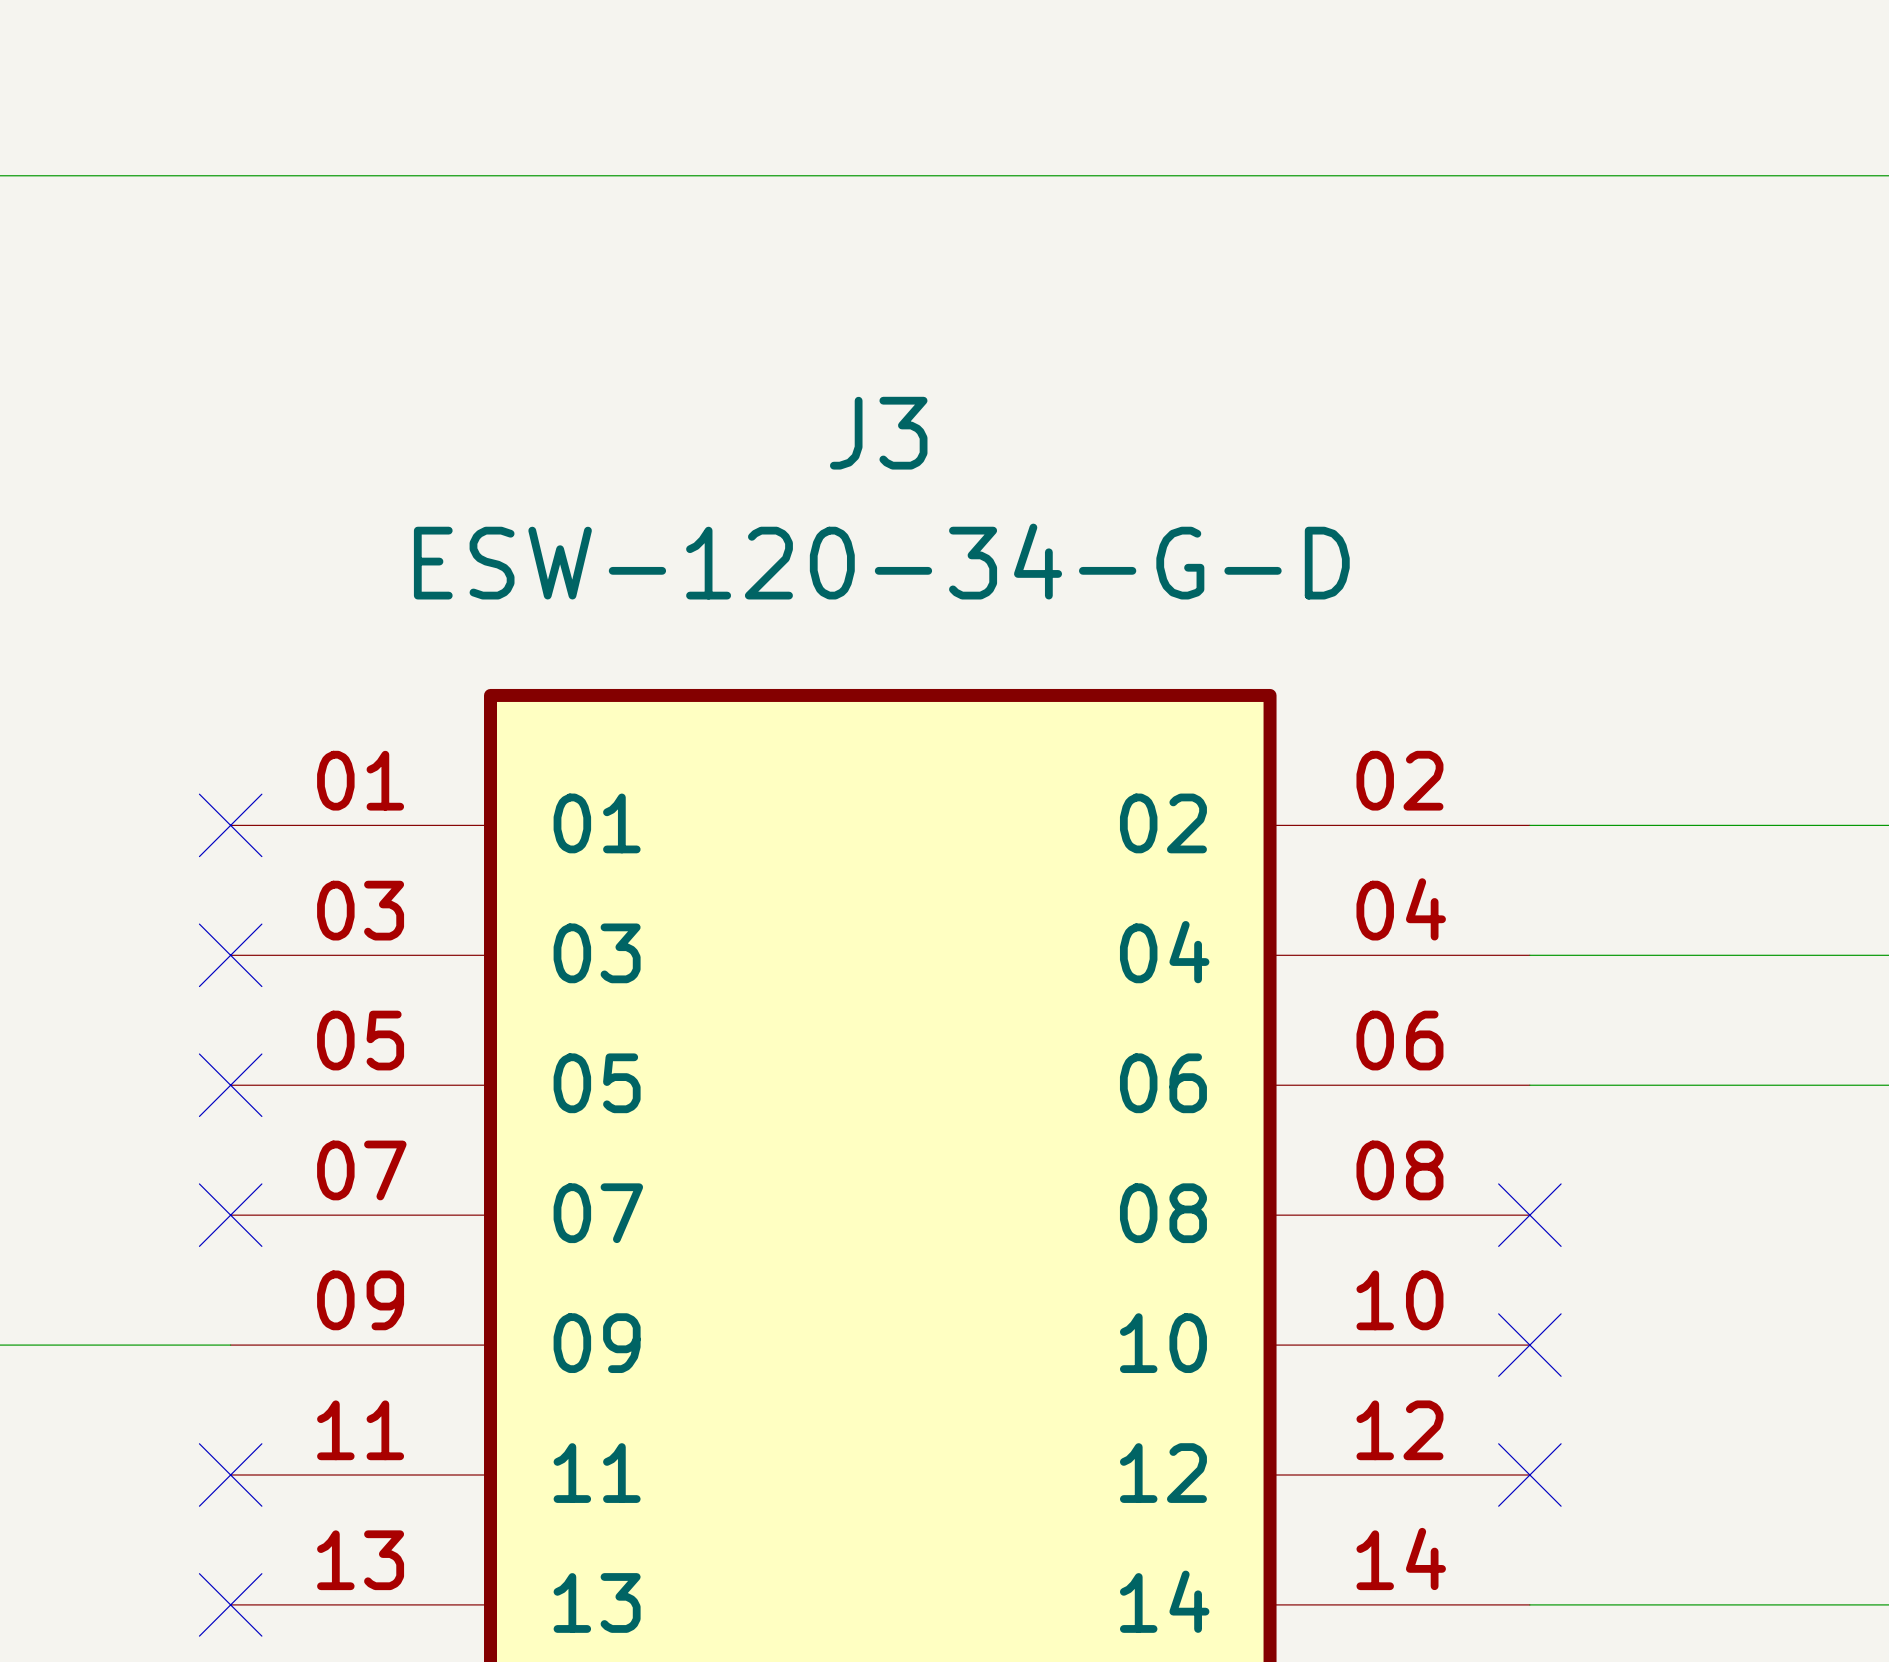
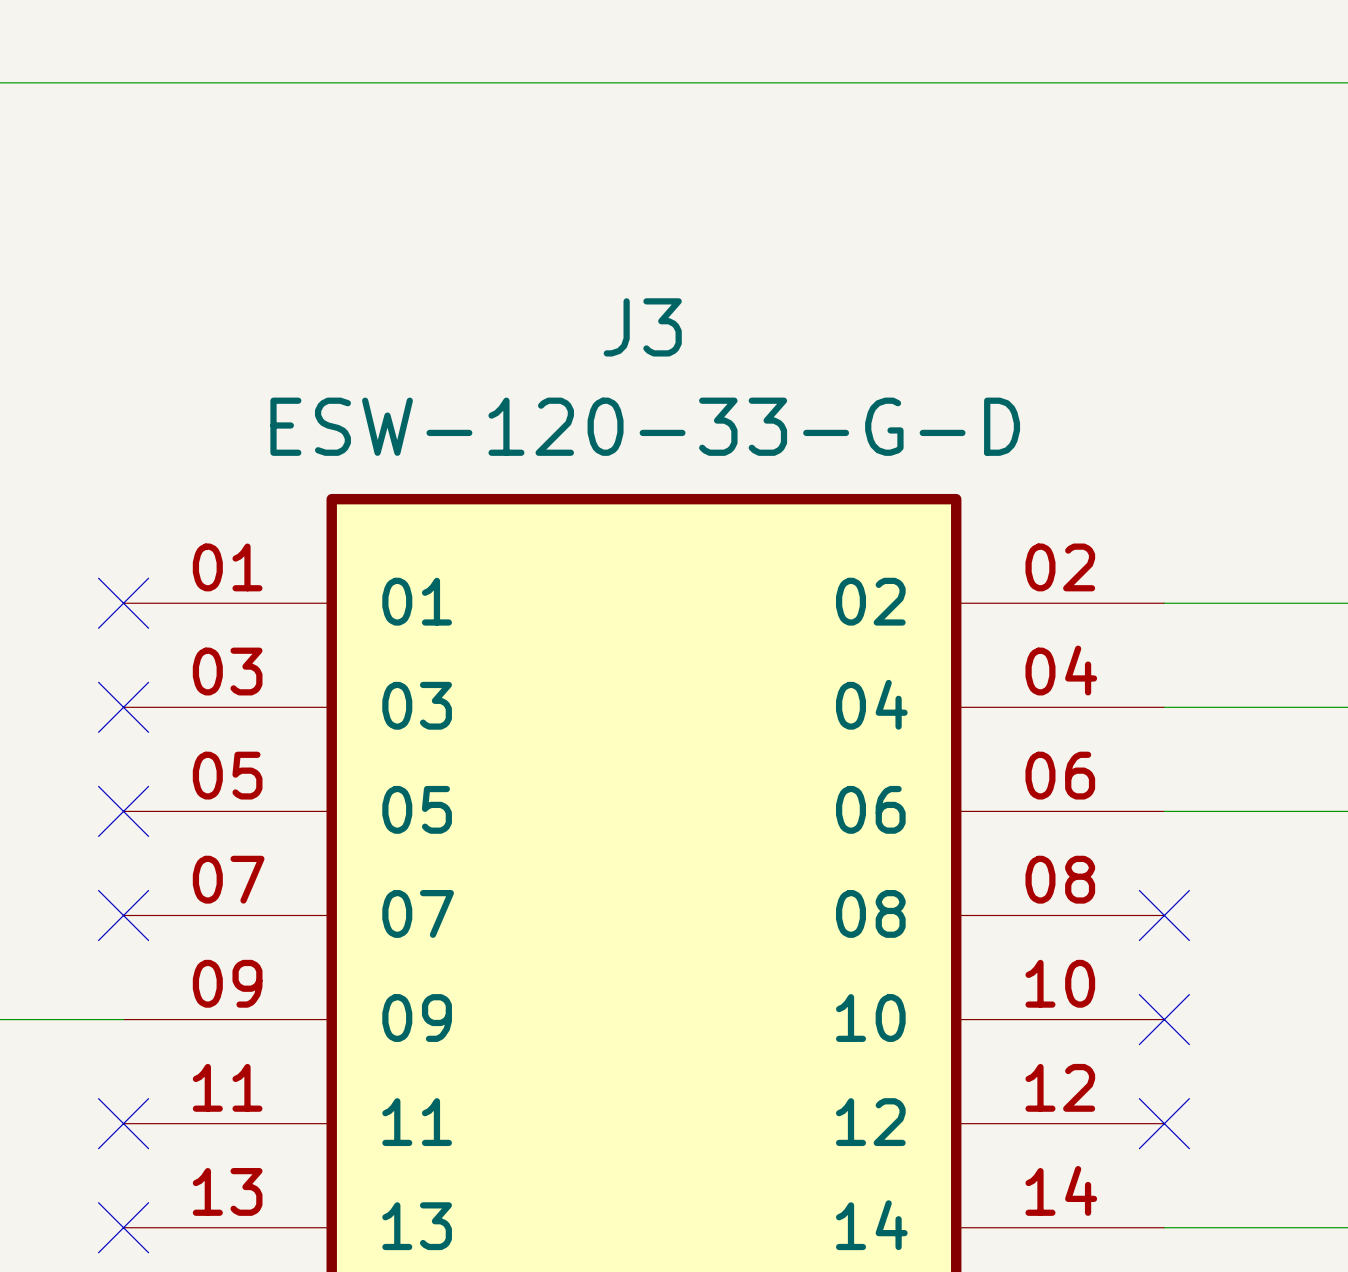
J3 name position: J3 (878, 433) -> J3 (642, 327)
J3 value: ESW-120-34-G-D (881, 561) -> ESW-120-33-G-D (645, 426)

